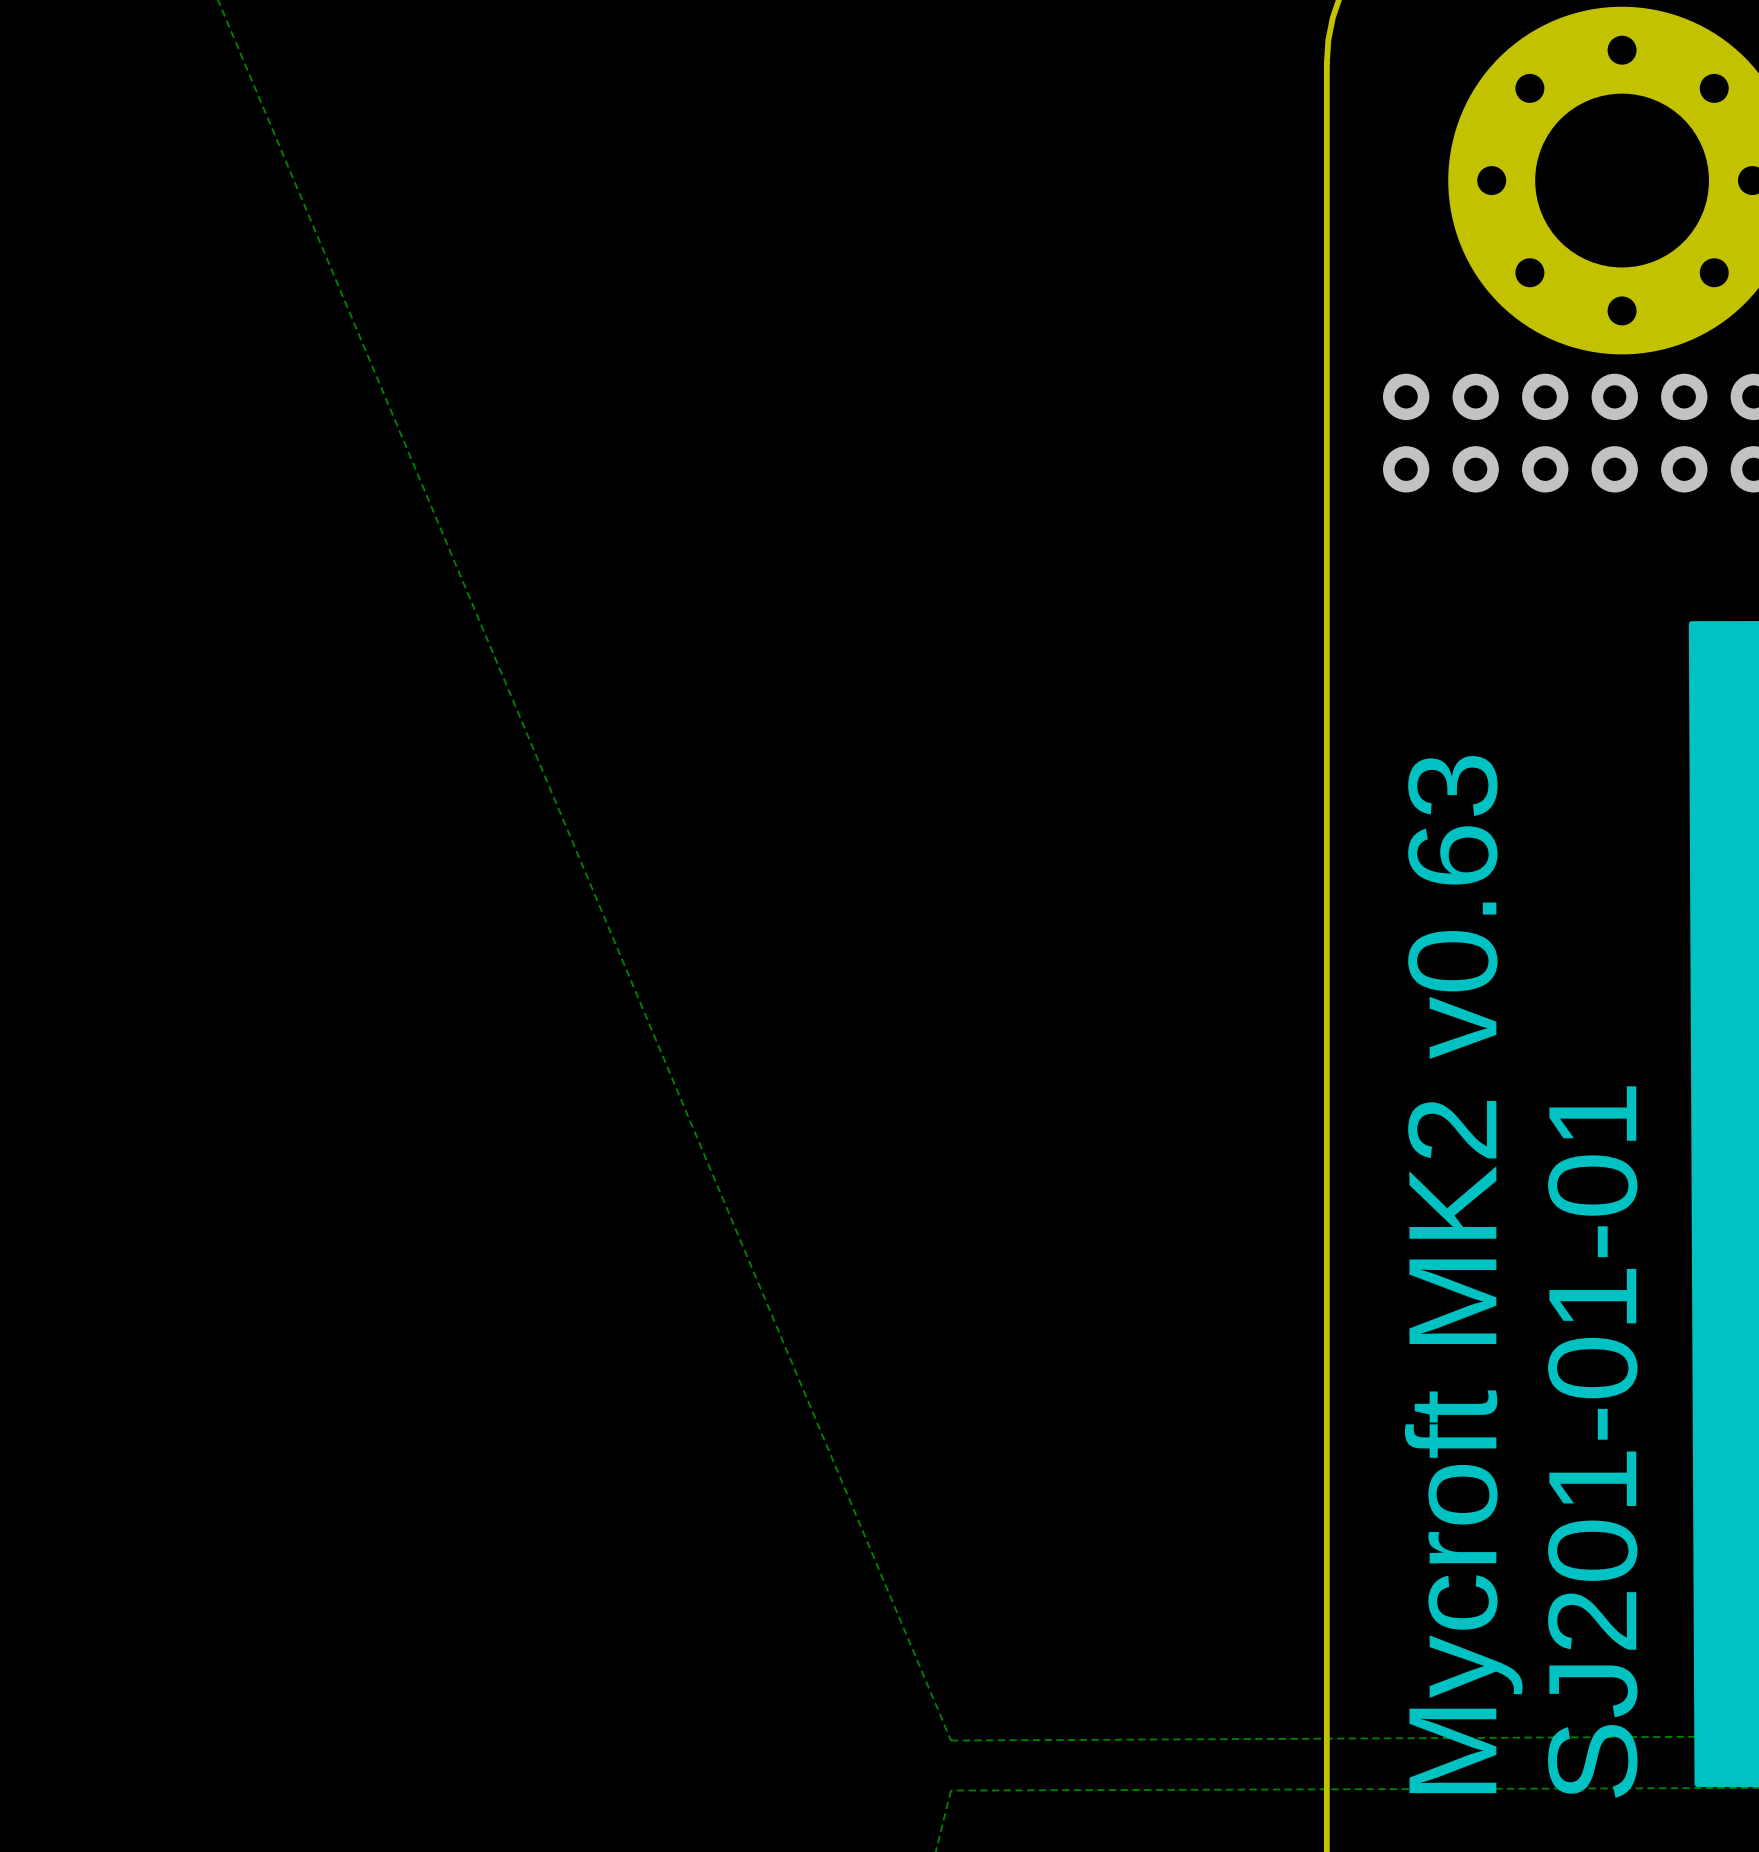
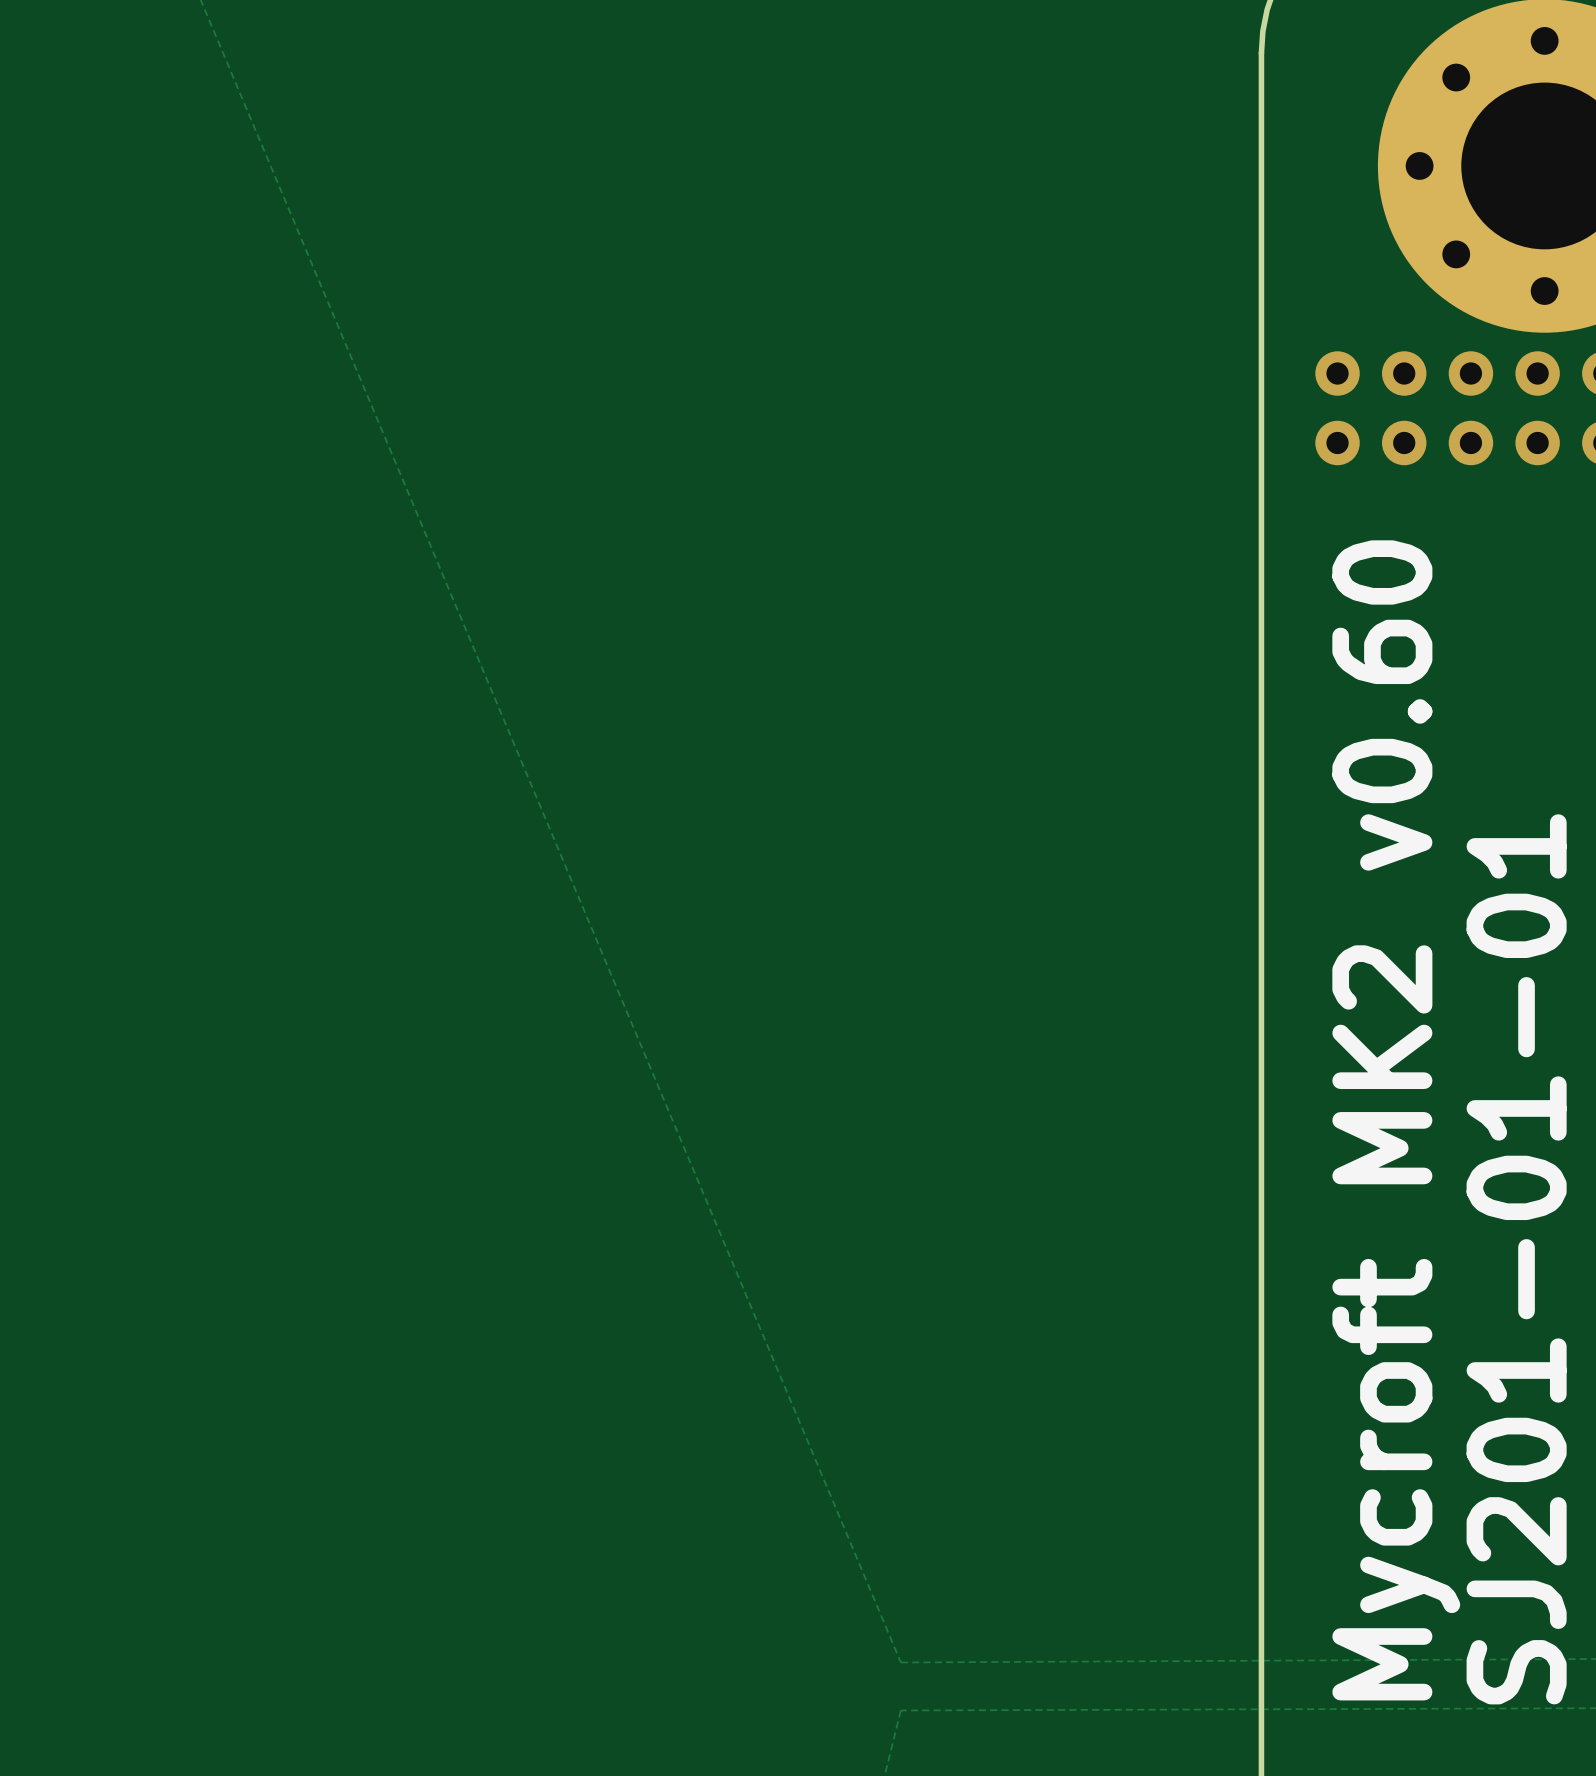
text: Mycroft MK2 v0.63 (1463, 1274) -> Mycroft MK2 v0.60 (1396, 1120)

